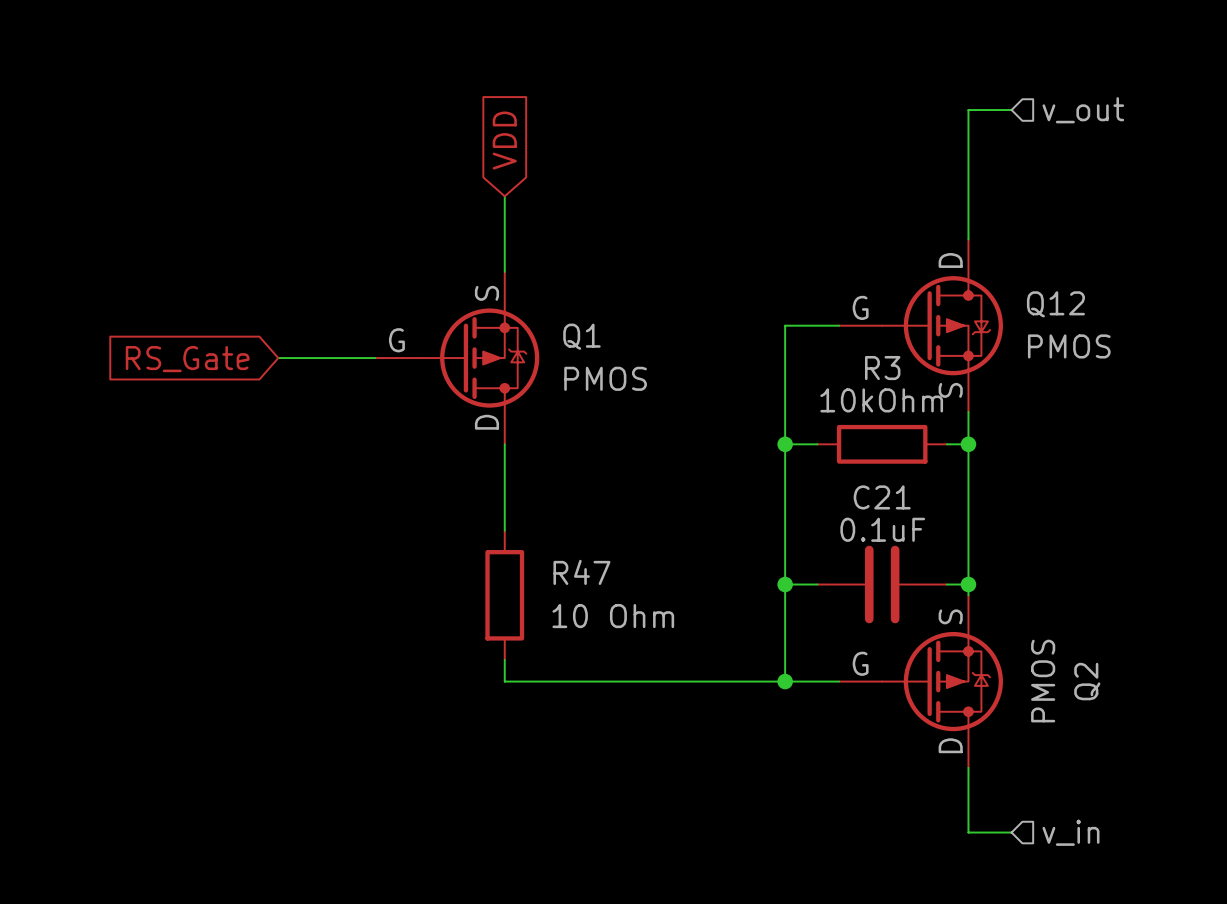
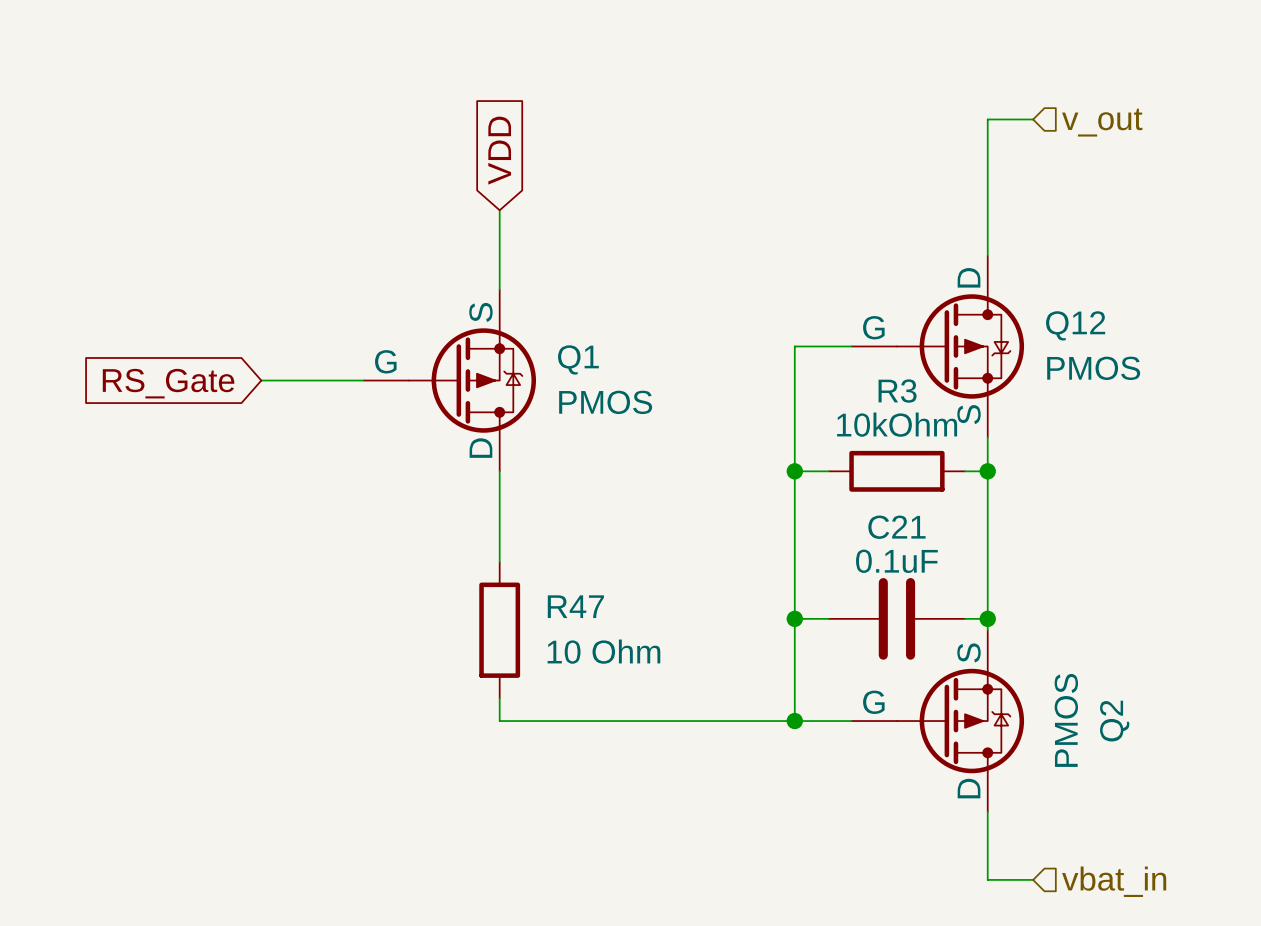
hierarchical label: v_in (1071, 832) -> vbat_in (1114, 881)

